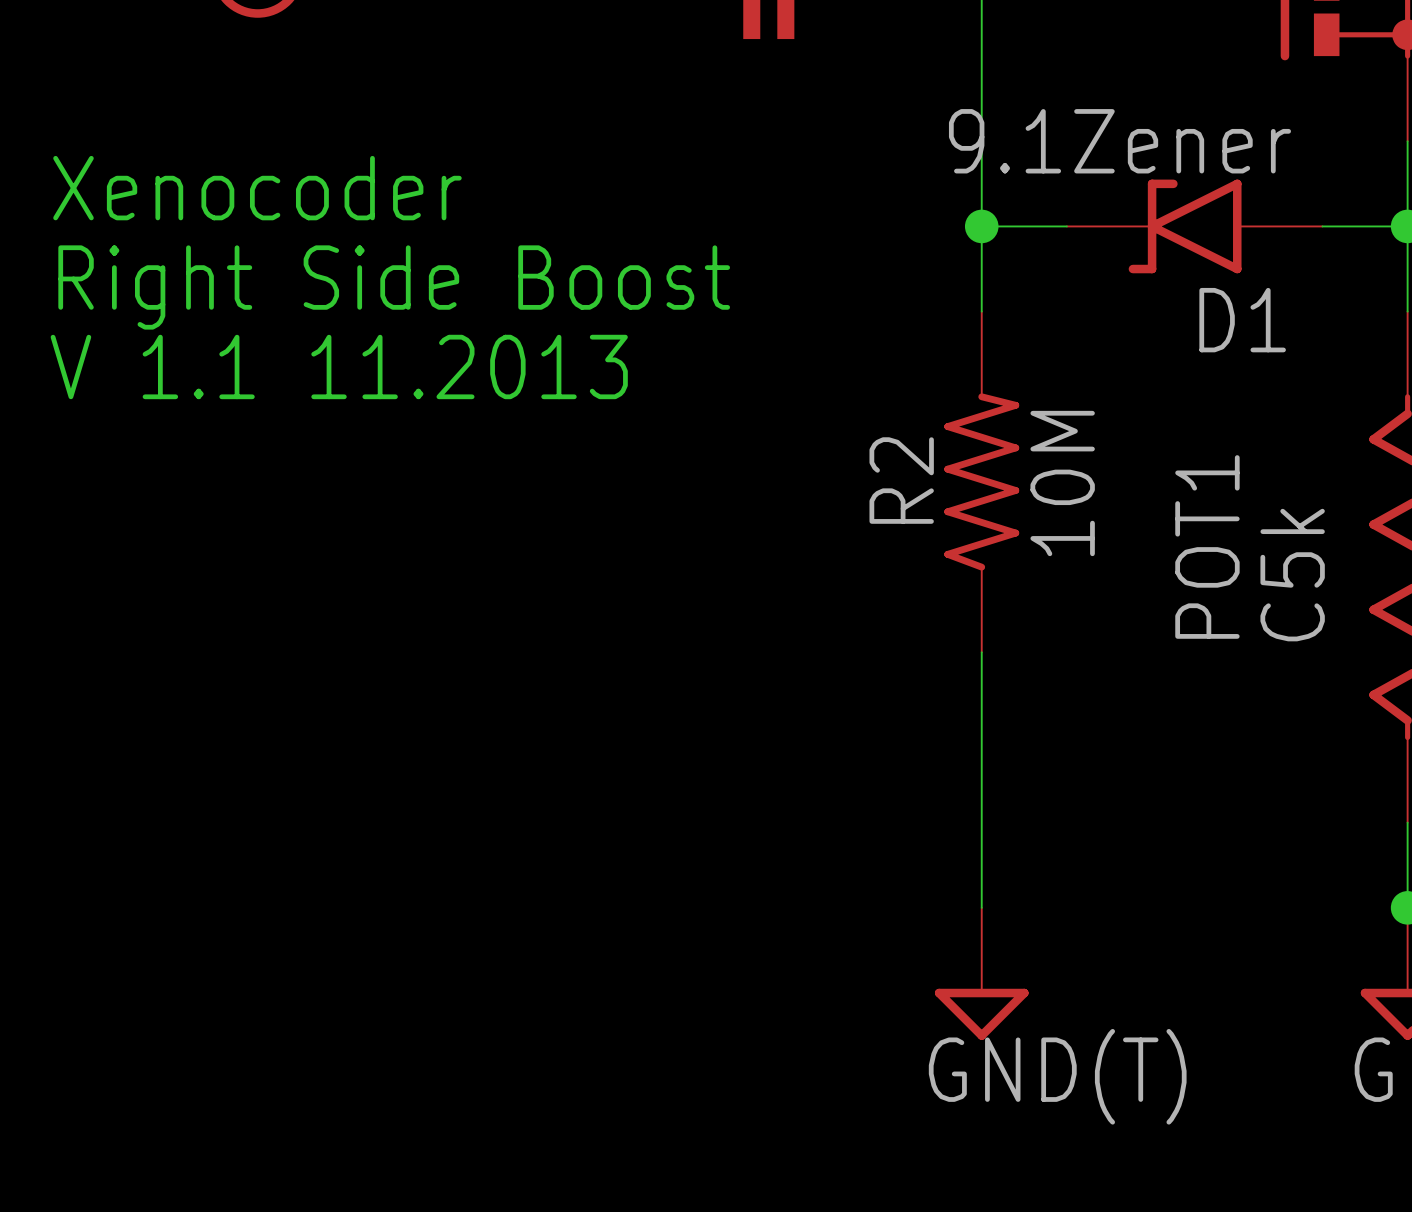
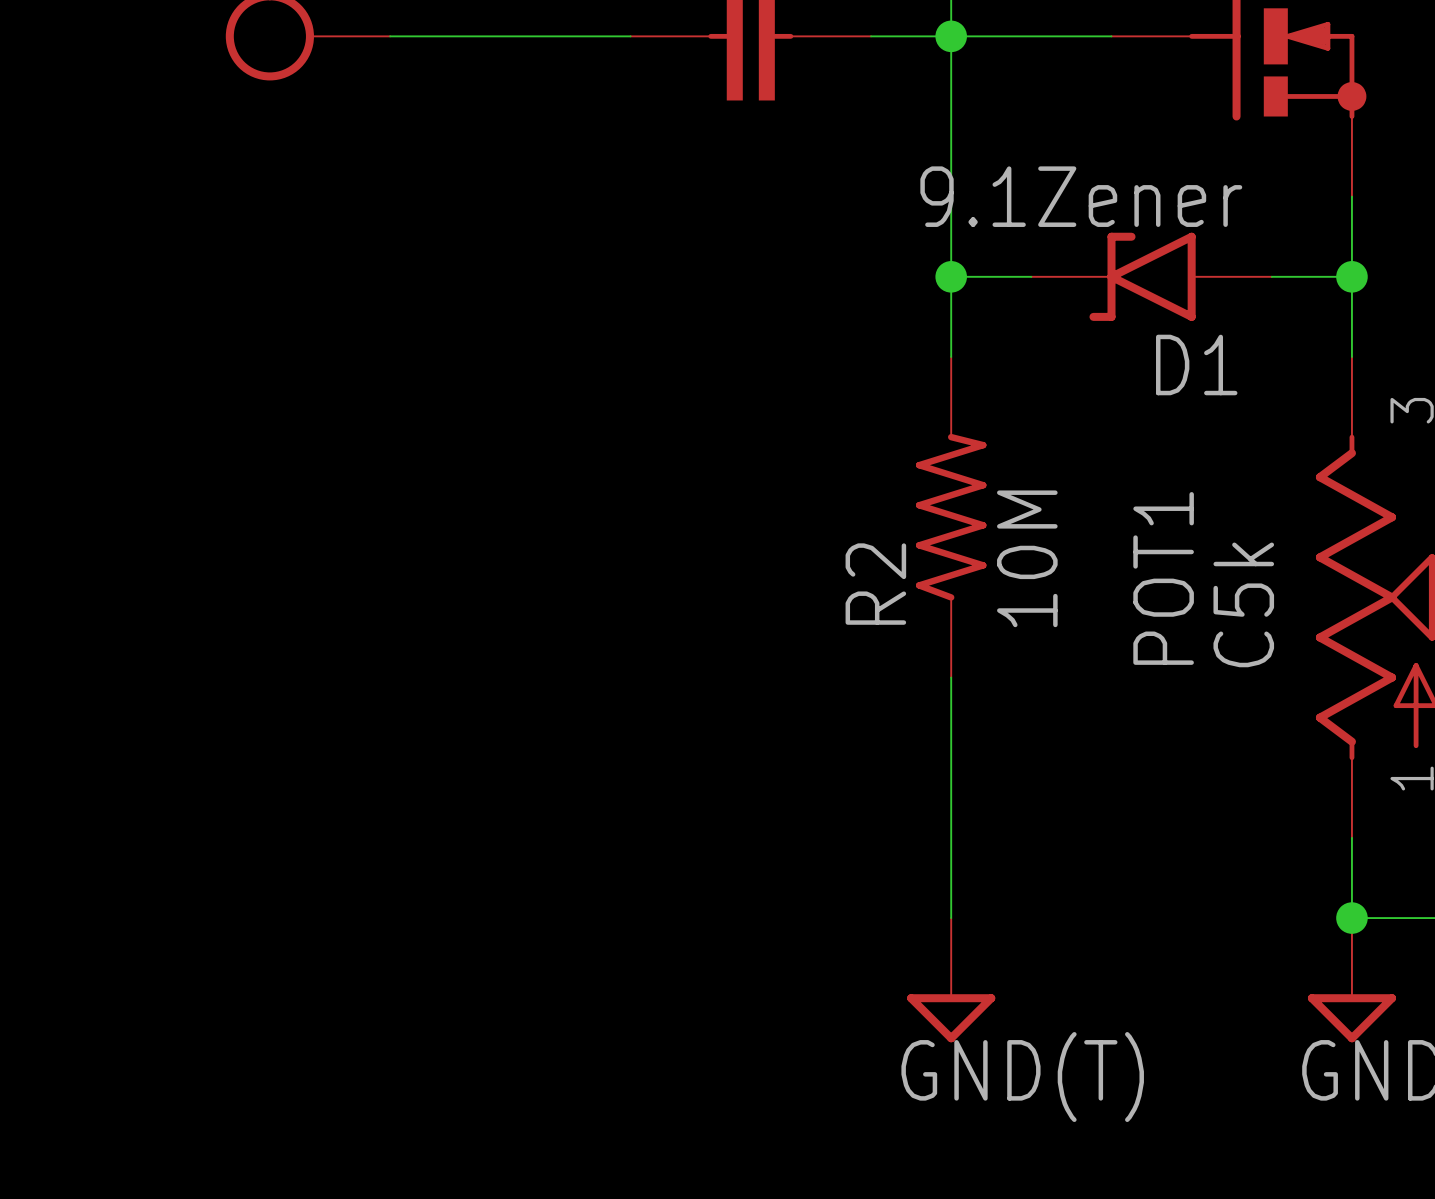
text: Xenocoder (257, 188) -> none
text: Right Side Boost (394, 287) -> none
text: V 1.1 11.2013 (339, 366) -> none
R2 name position: R2 (901, 480) -> R2 (875, 584)
R2 value position: 10M (1062, 483) -> 10M (1027, 558)

